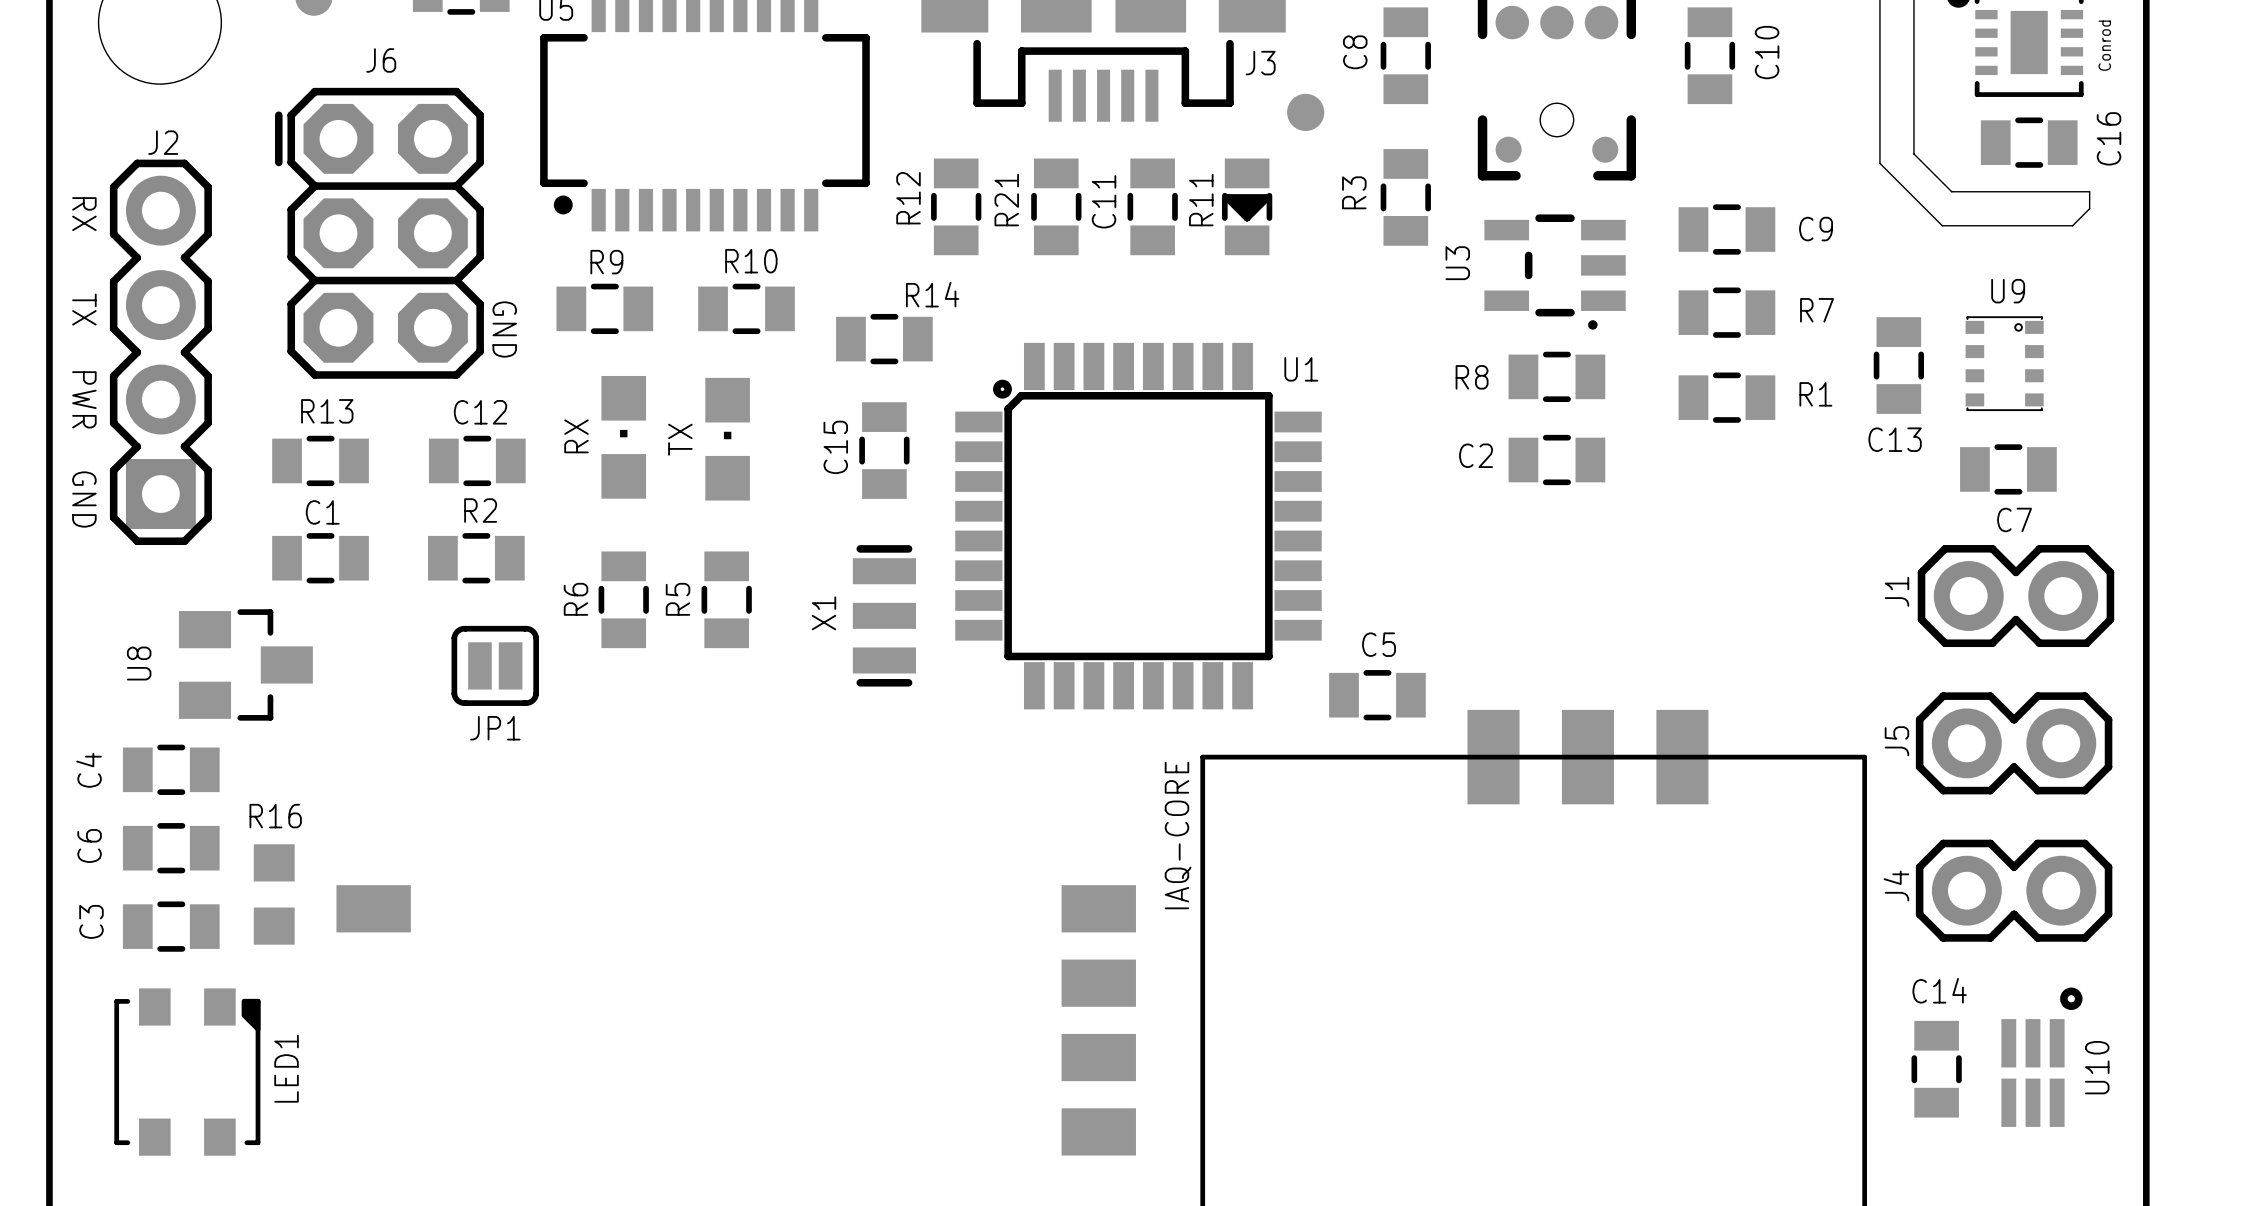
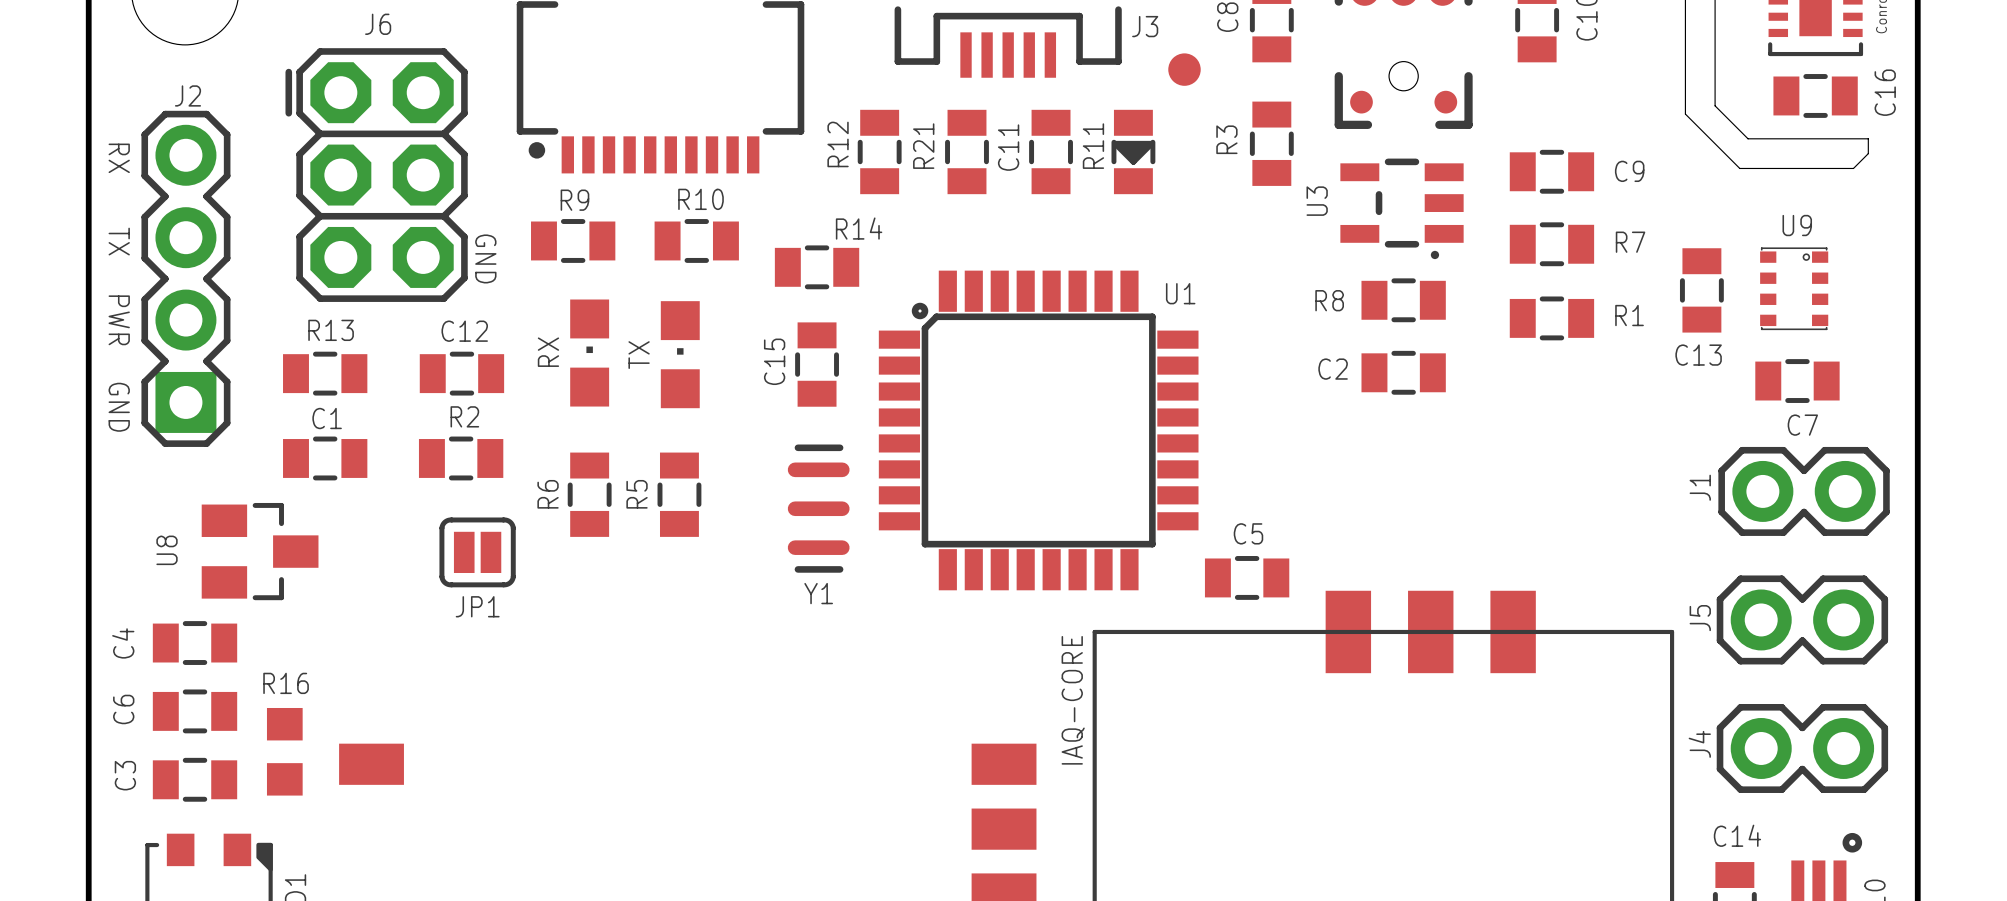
X1: (884, 615) -> none
Y1: none -> (818, 508)

